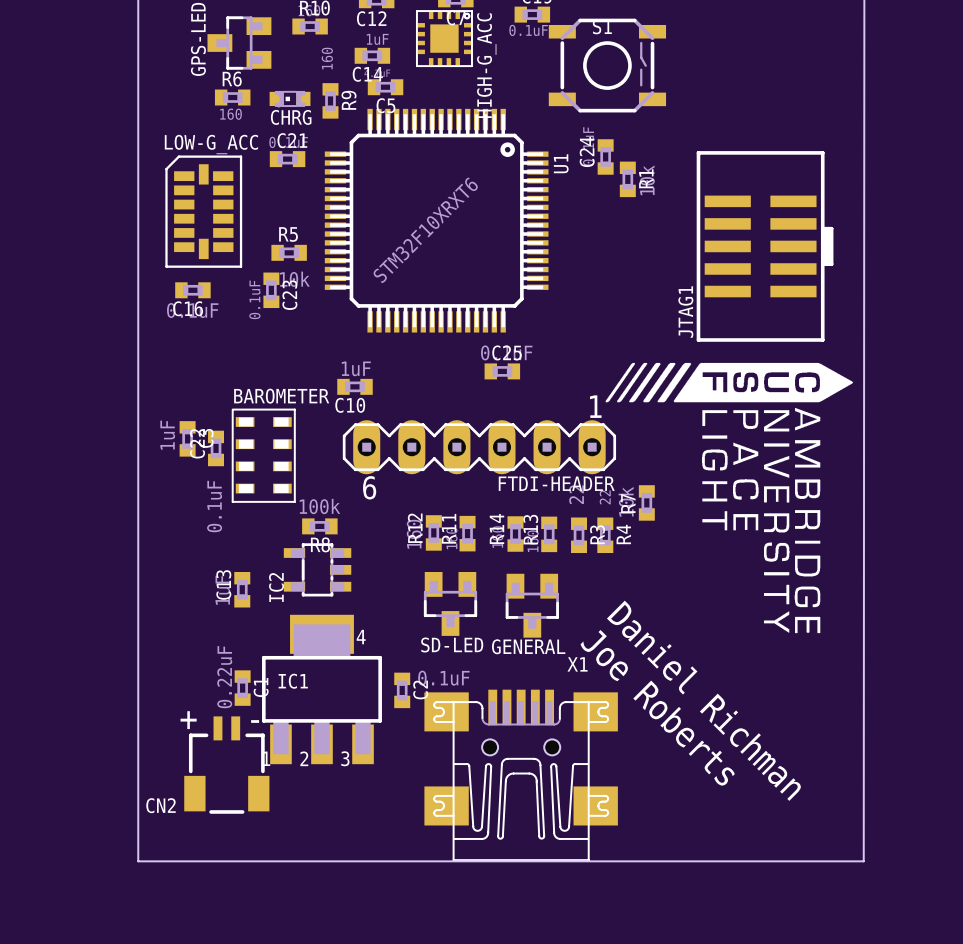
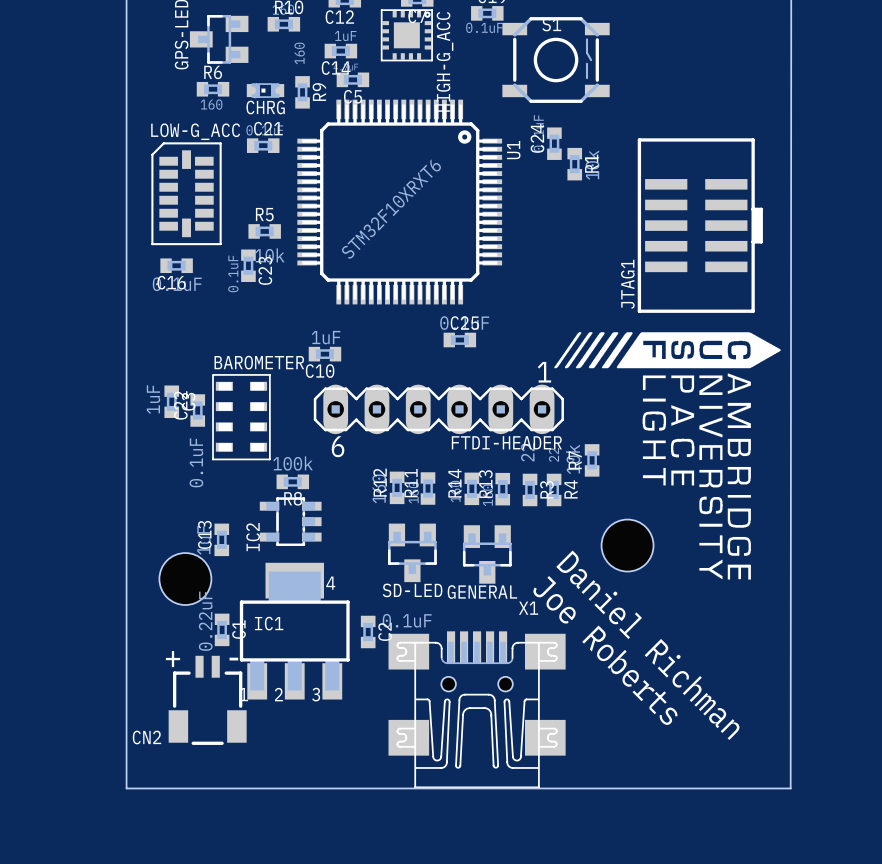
hole: none -> (627, 545)
hole: none -> (185, 579)

